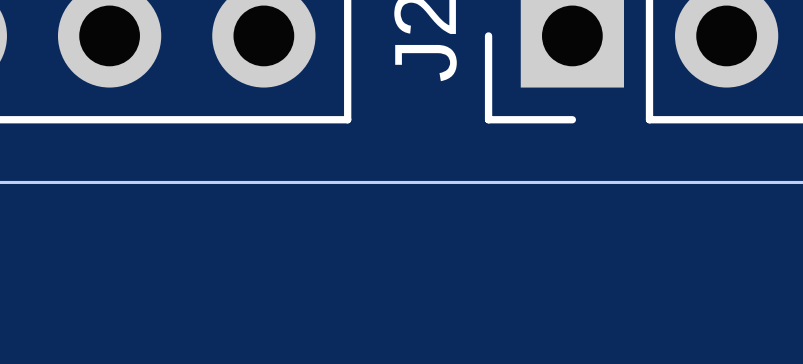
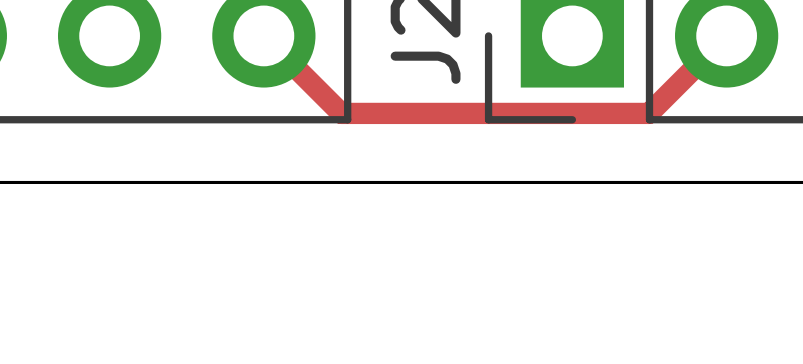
track: none -> (263, 35) (341, 113) (649, 113) (726, 35)

